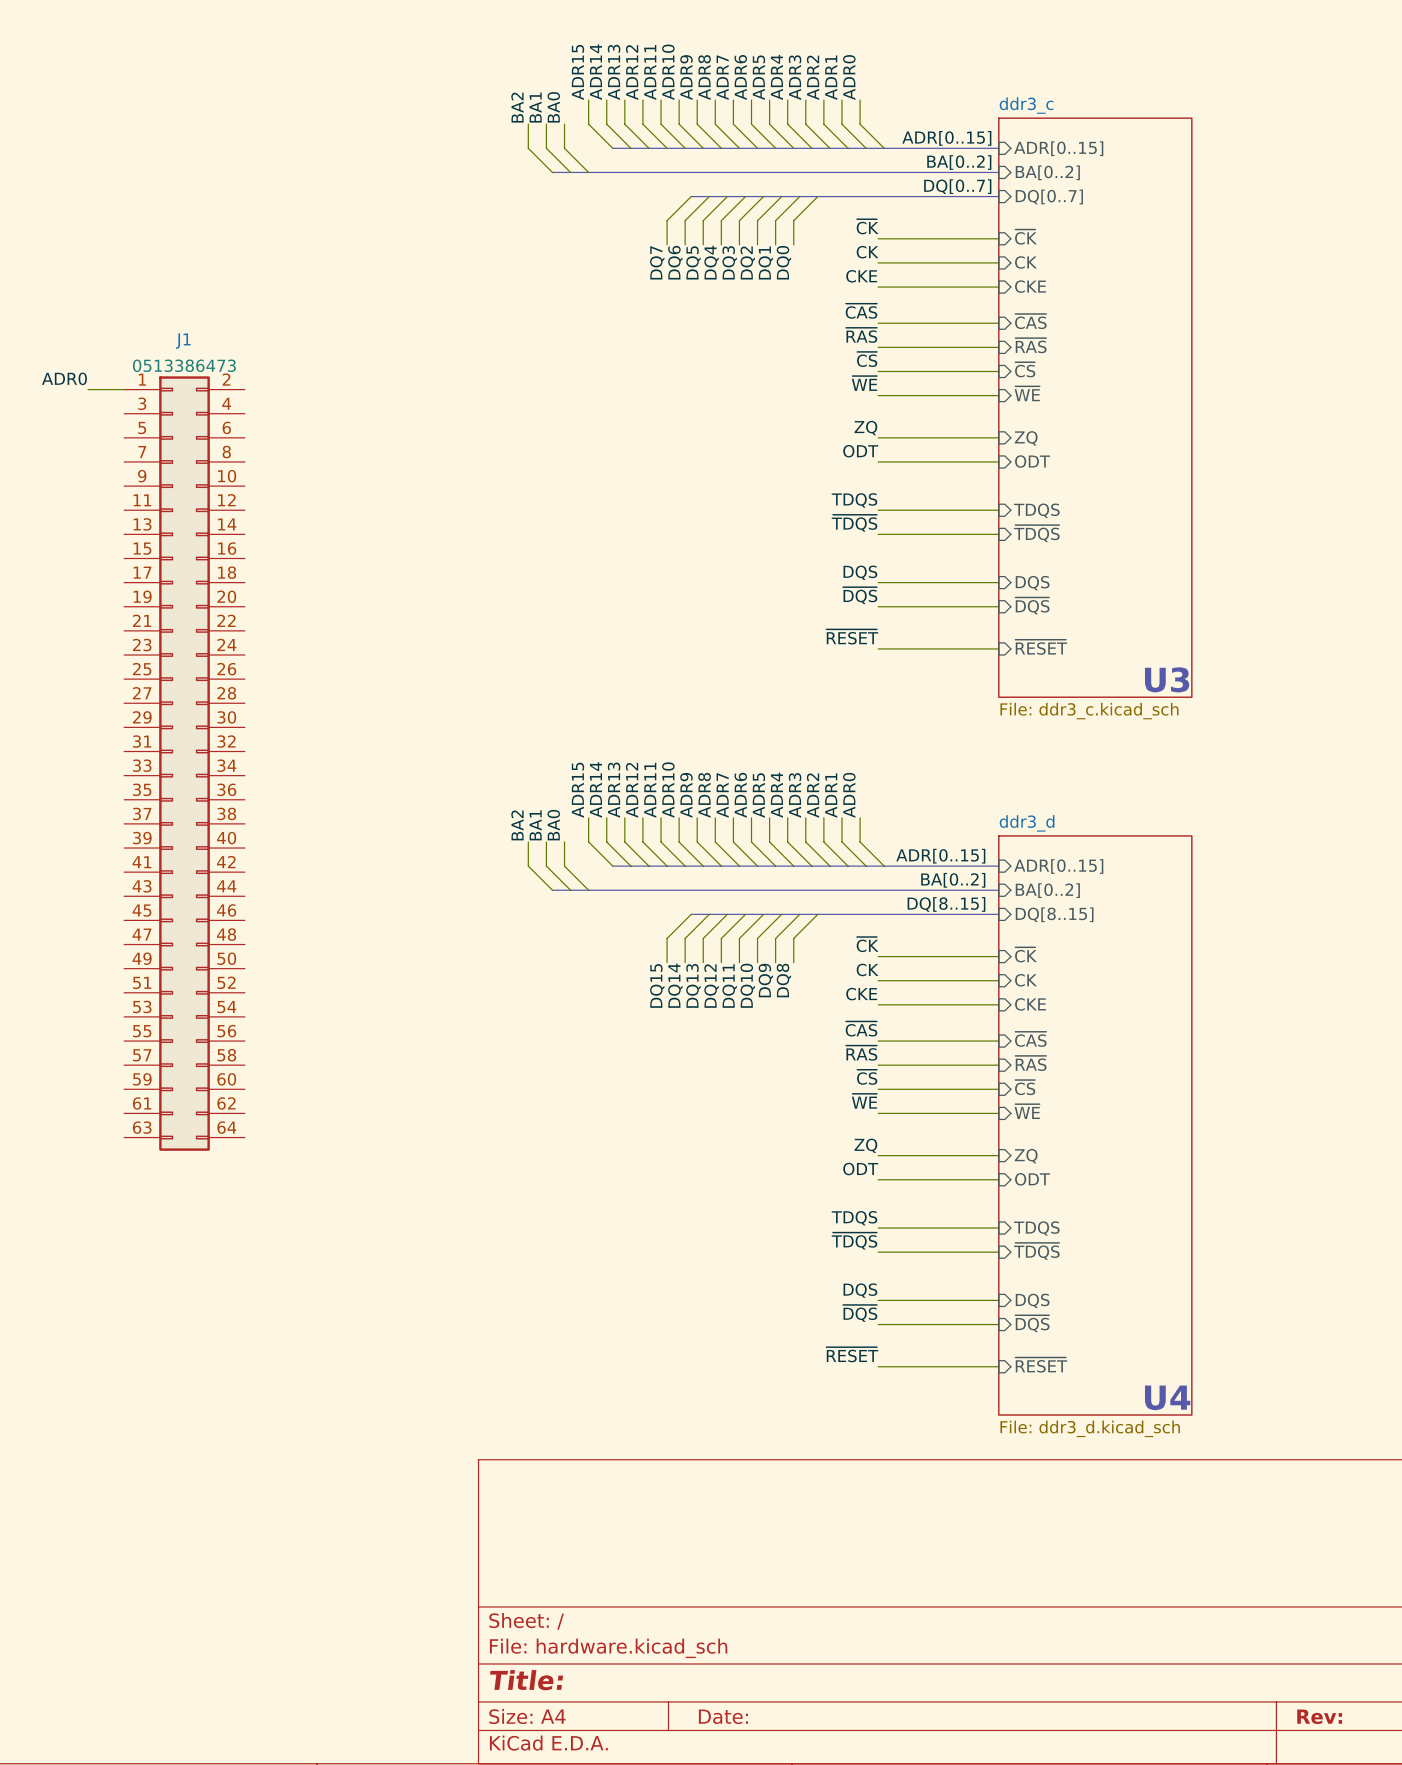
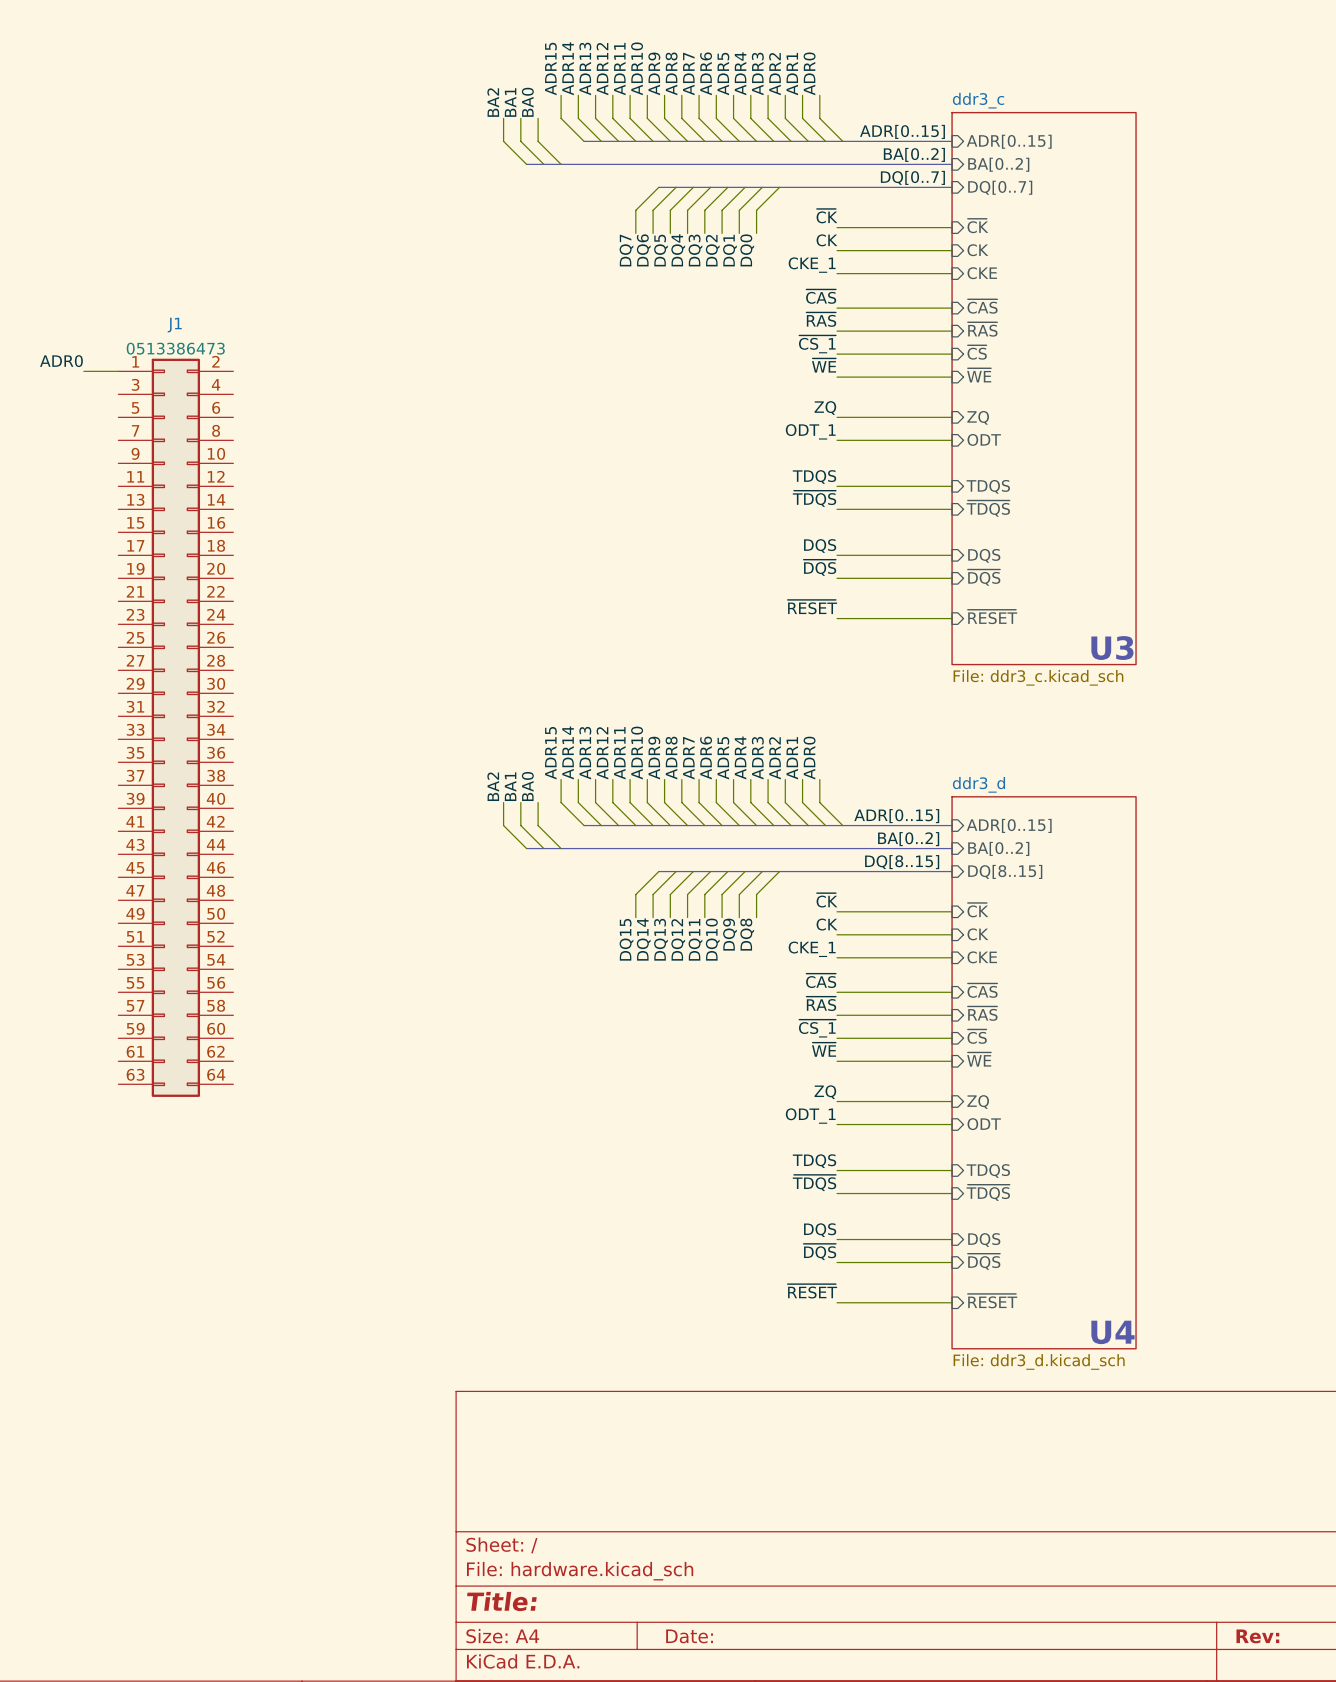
label: CKE (861, 276) -> CKE_1 (812, 265)
label: ~{CS} (867, 359) -> ~{CS_1} (817, 344)
label: ODT (860, 451) -> ODT_1 (810, 431)
label: CKE (861, 994) -> CKE_1 (812, 949)
label: ~{CS} (867, 1077) -> ~{CS_1} (817, 1028)
label: ODT (860, 1169) -> ODT_1 (810, 1116)

